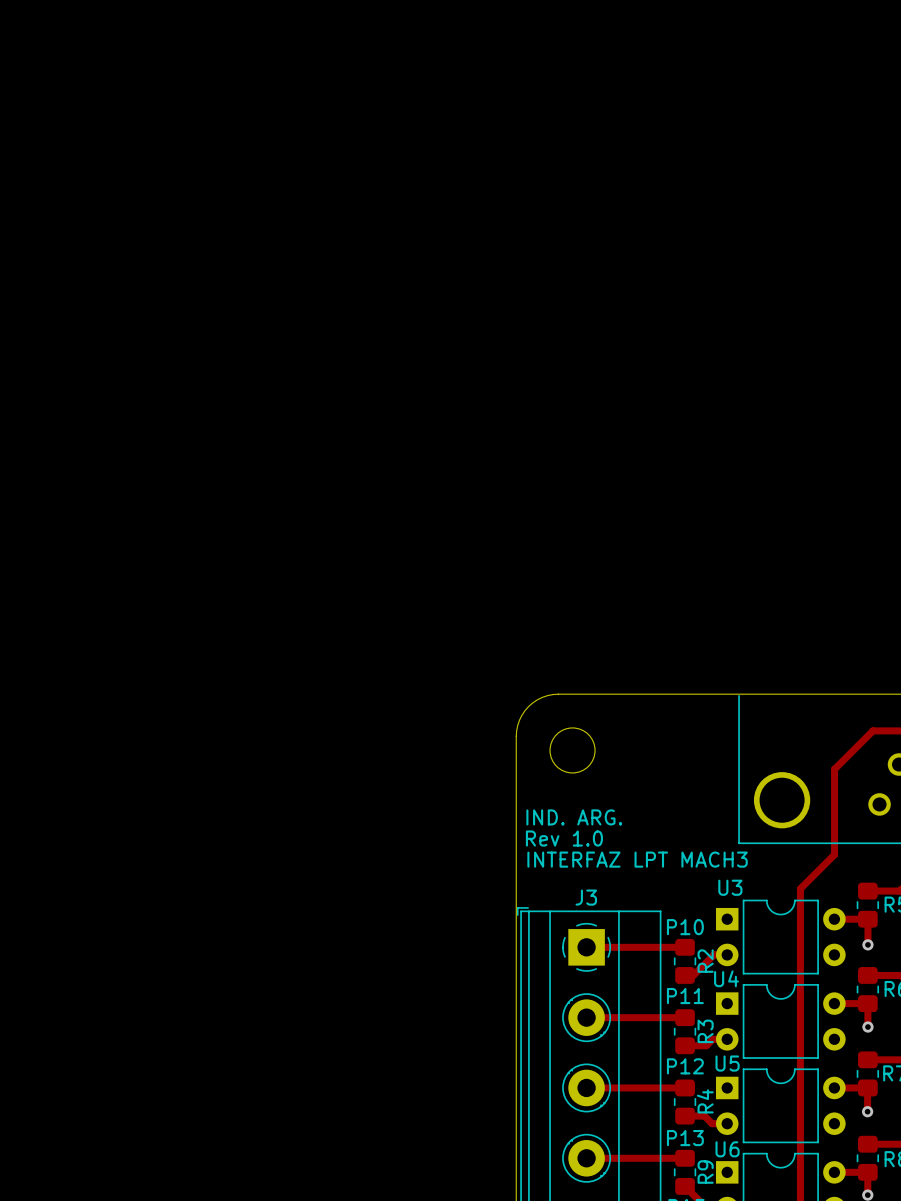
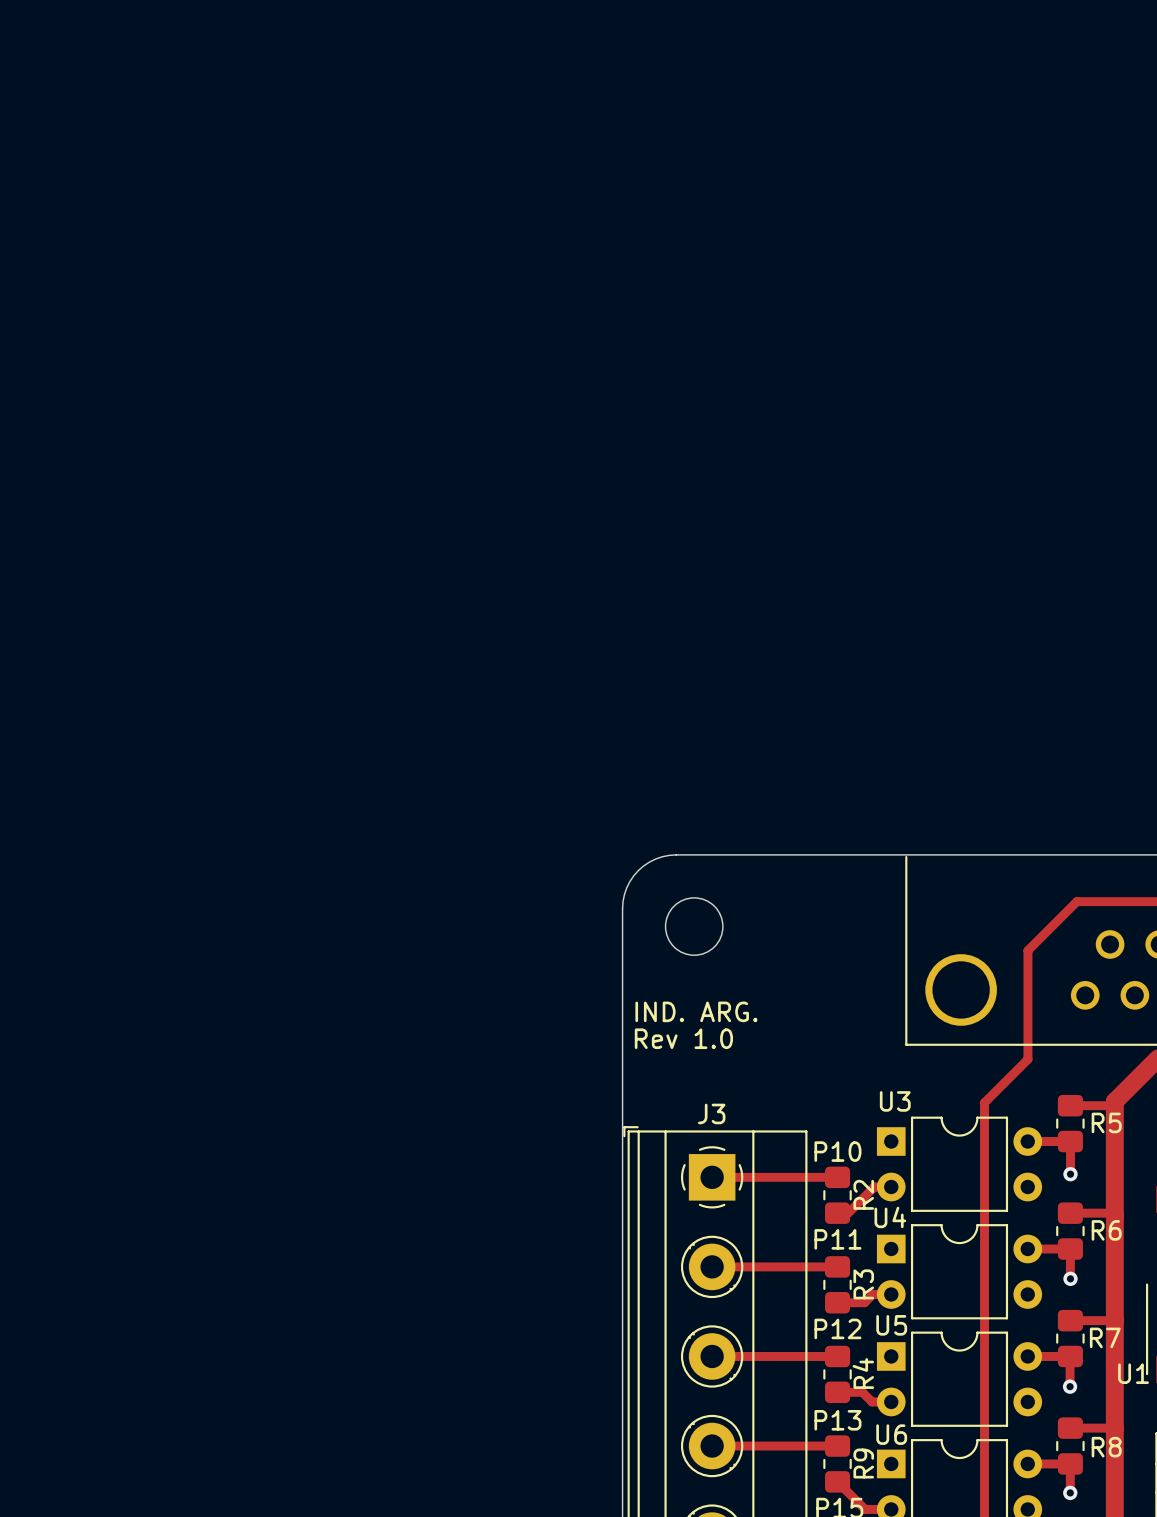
text: INTERFAZ LPT MACH3 (637, 859) -> none

